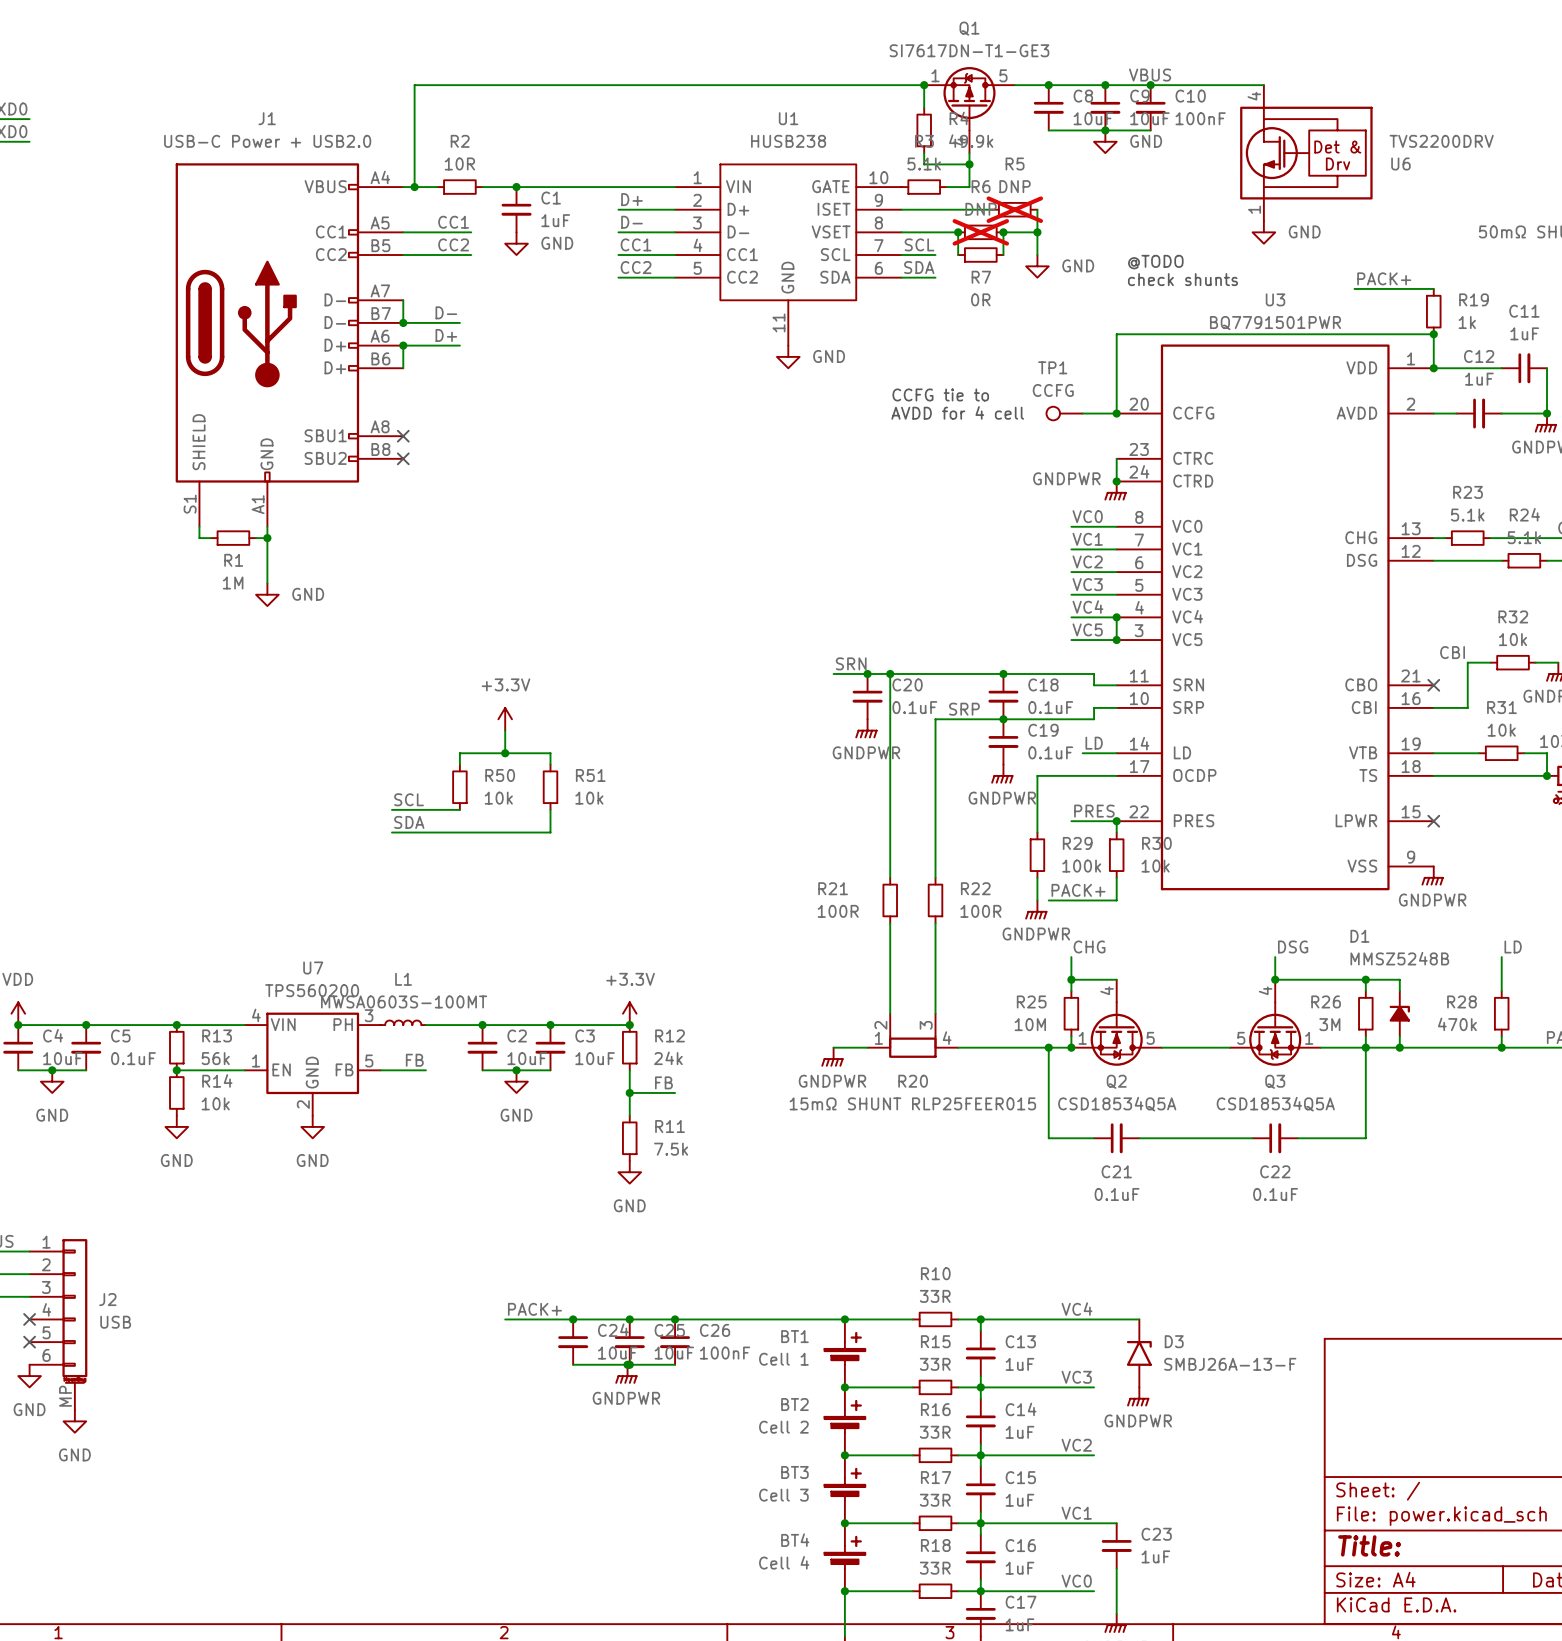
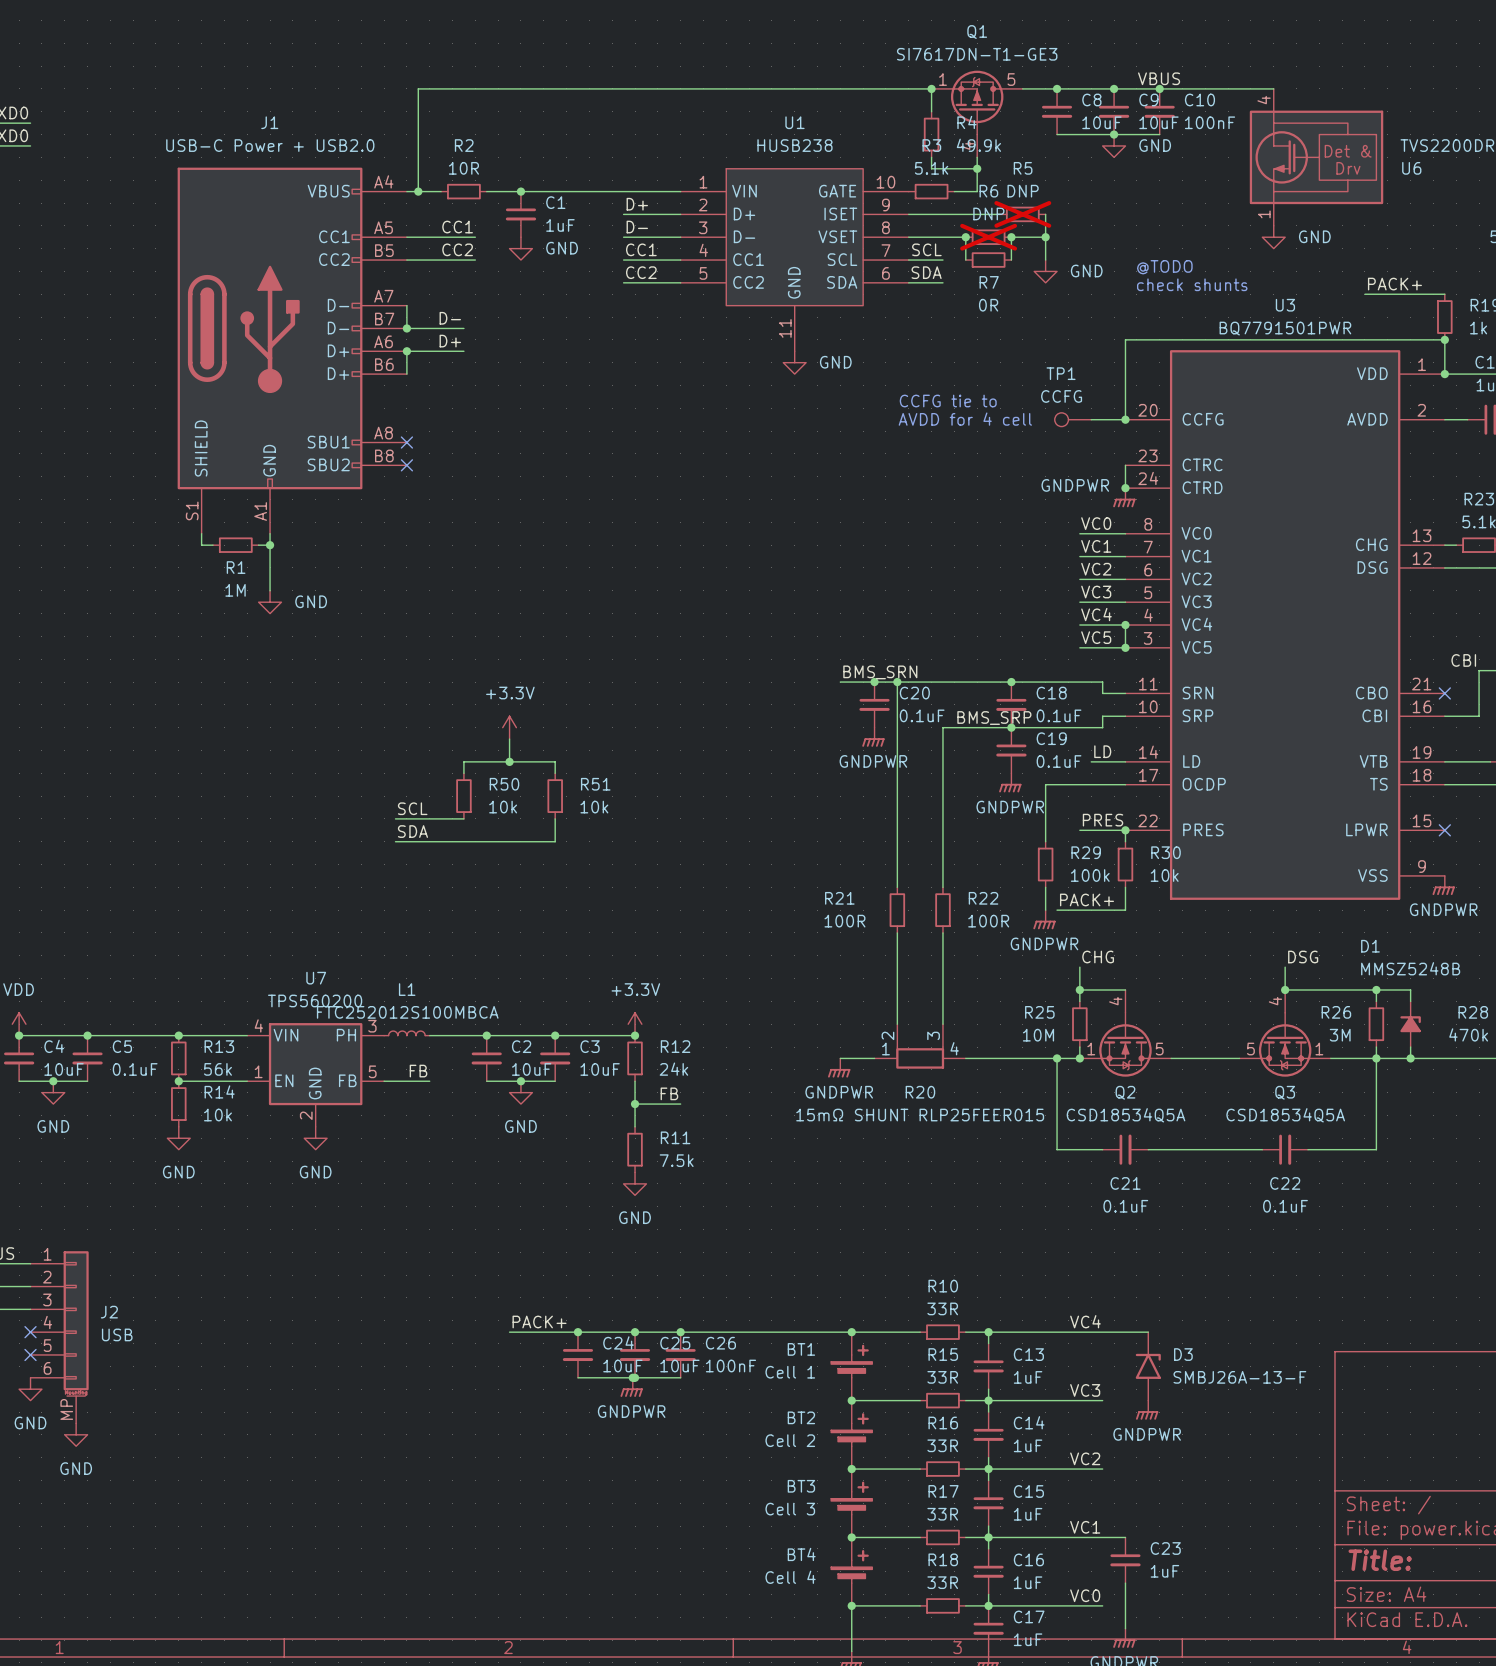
label: SRN (851, 663) -> BMS_SRN (880, 672)
label: SRP (964, 709) -> BMS_SRP (994, 718)
L1 value: MWSA0603S-100MT (404, 1001) -> FTC252012S100MBCA (407, 1012)

